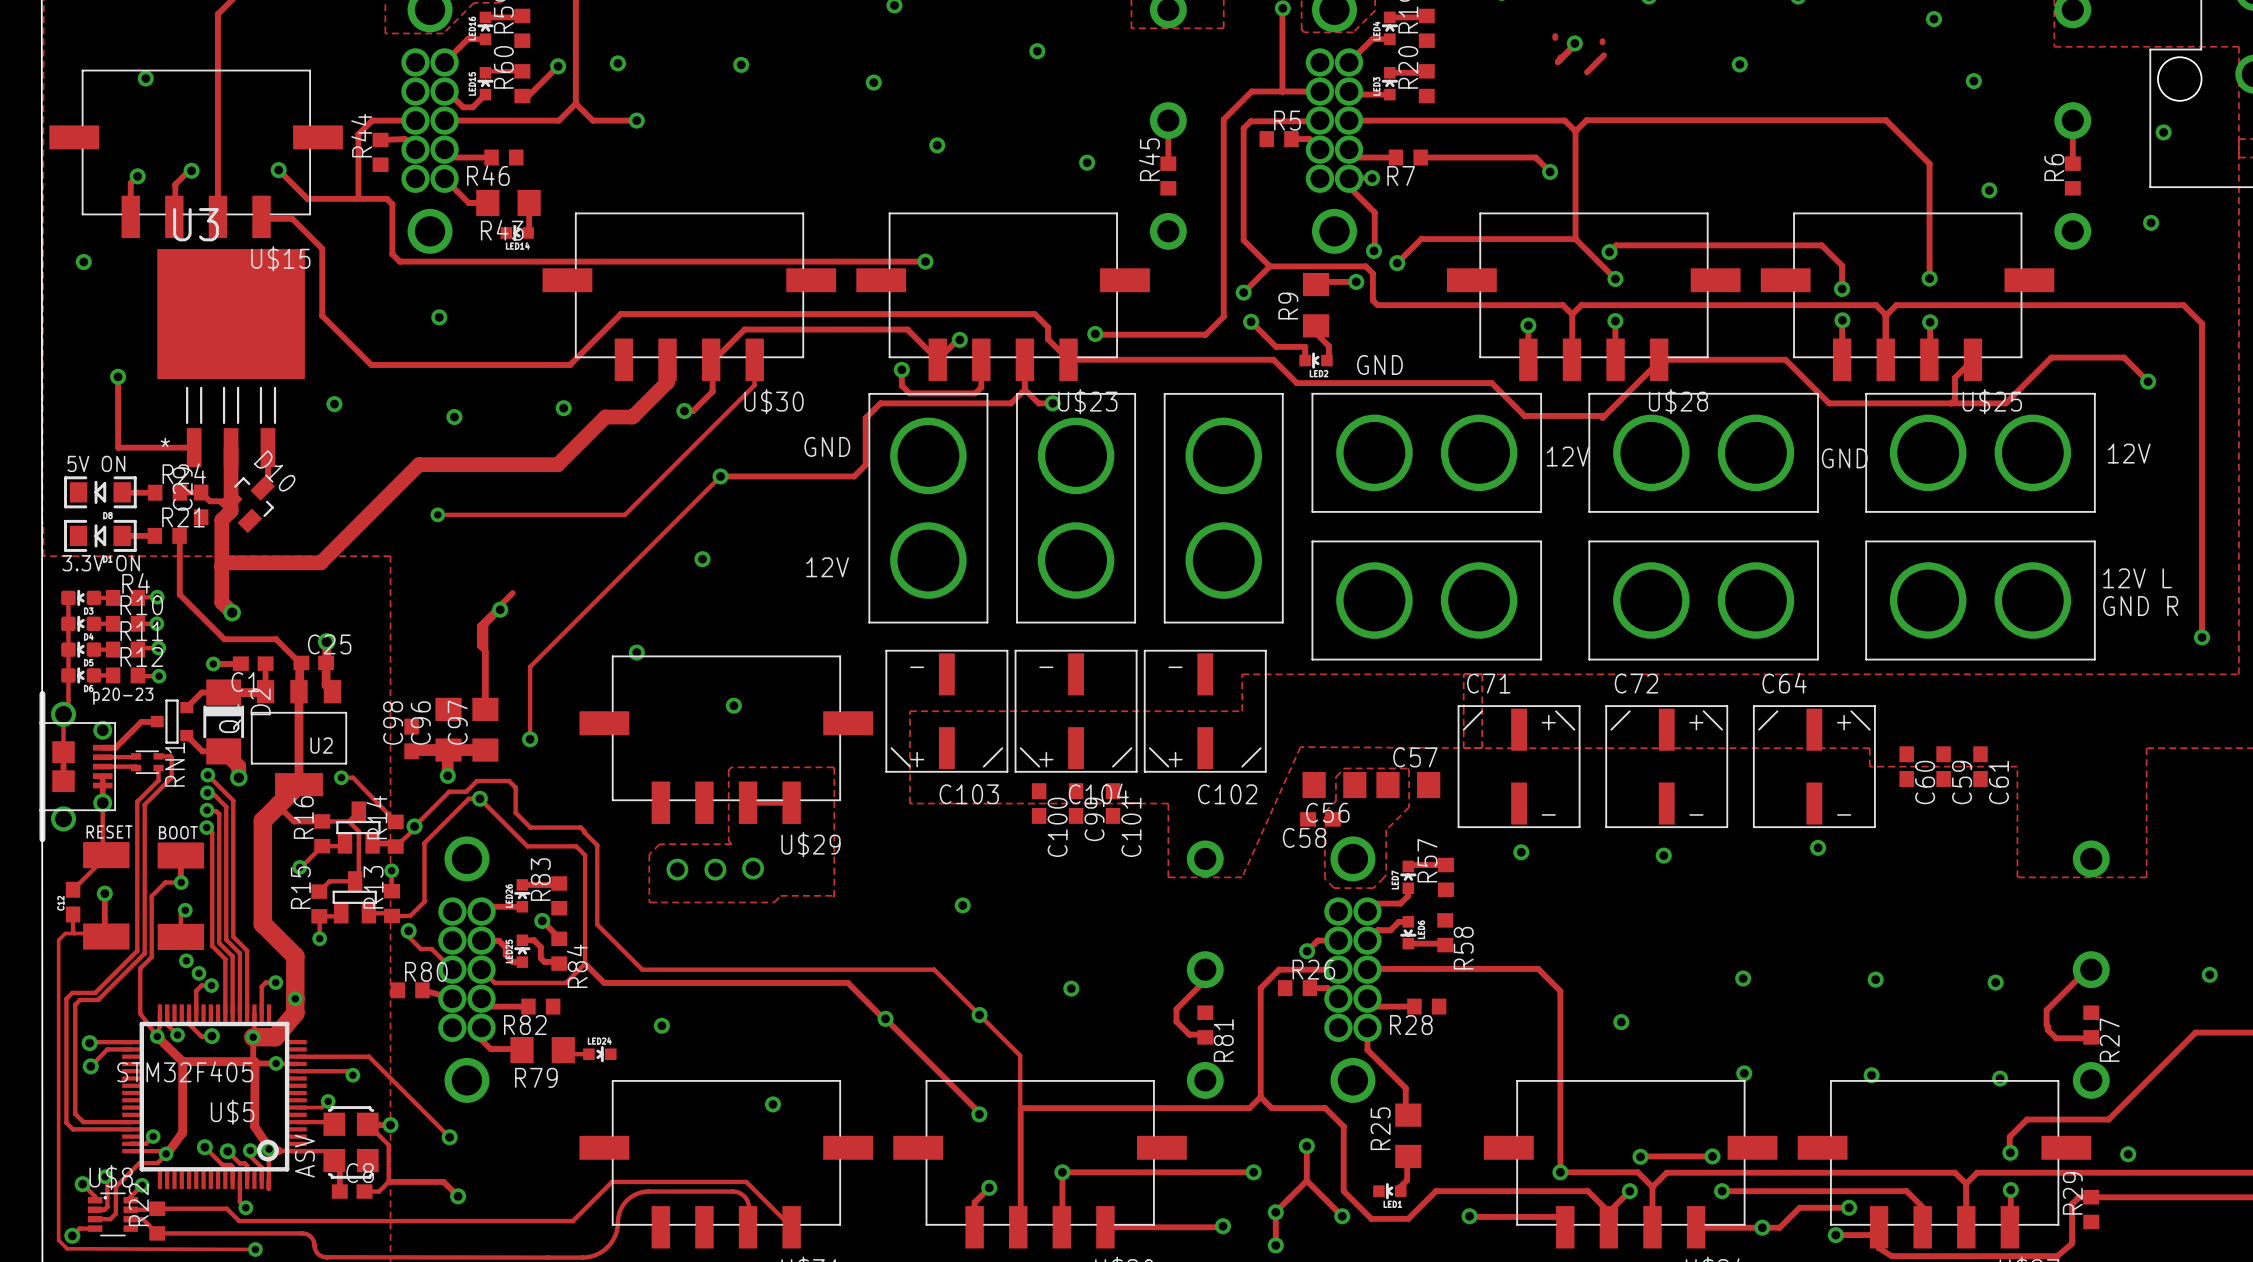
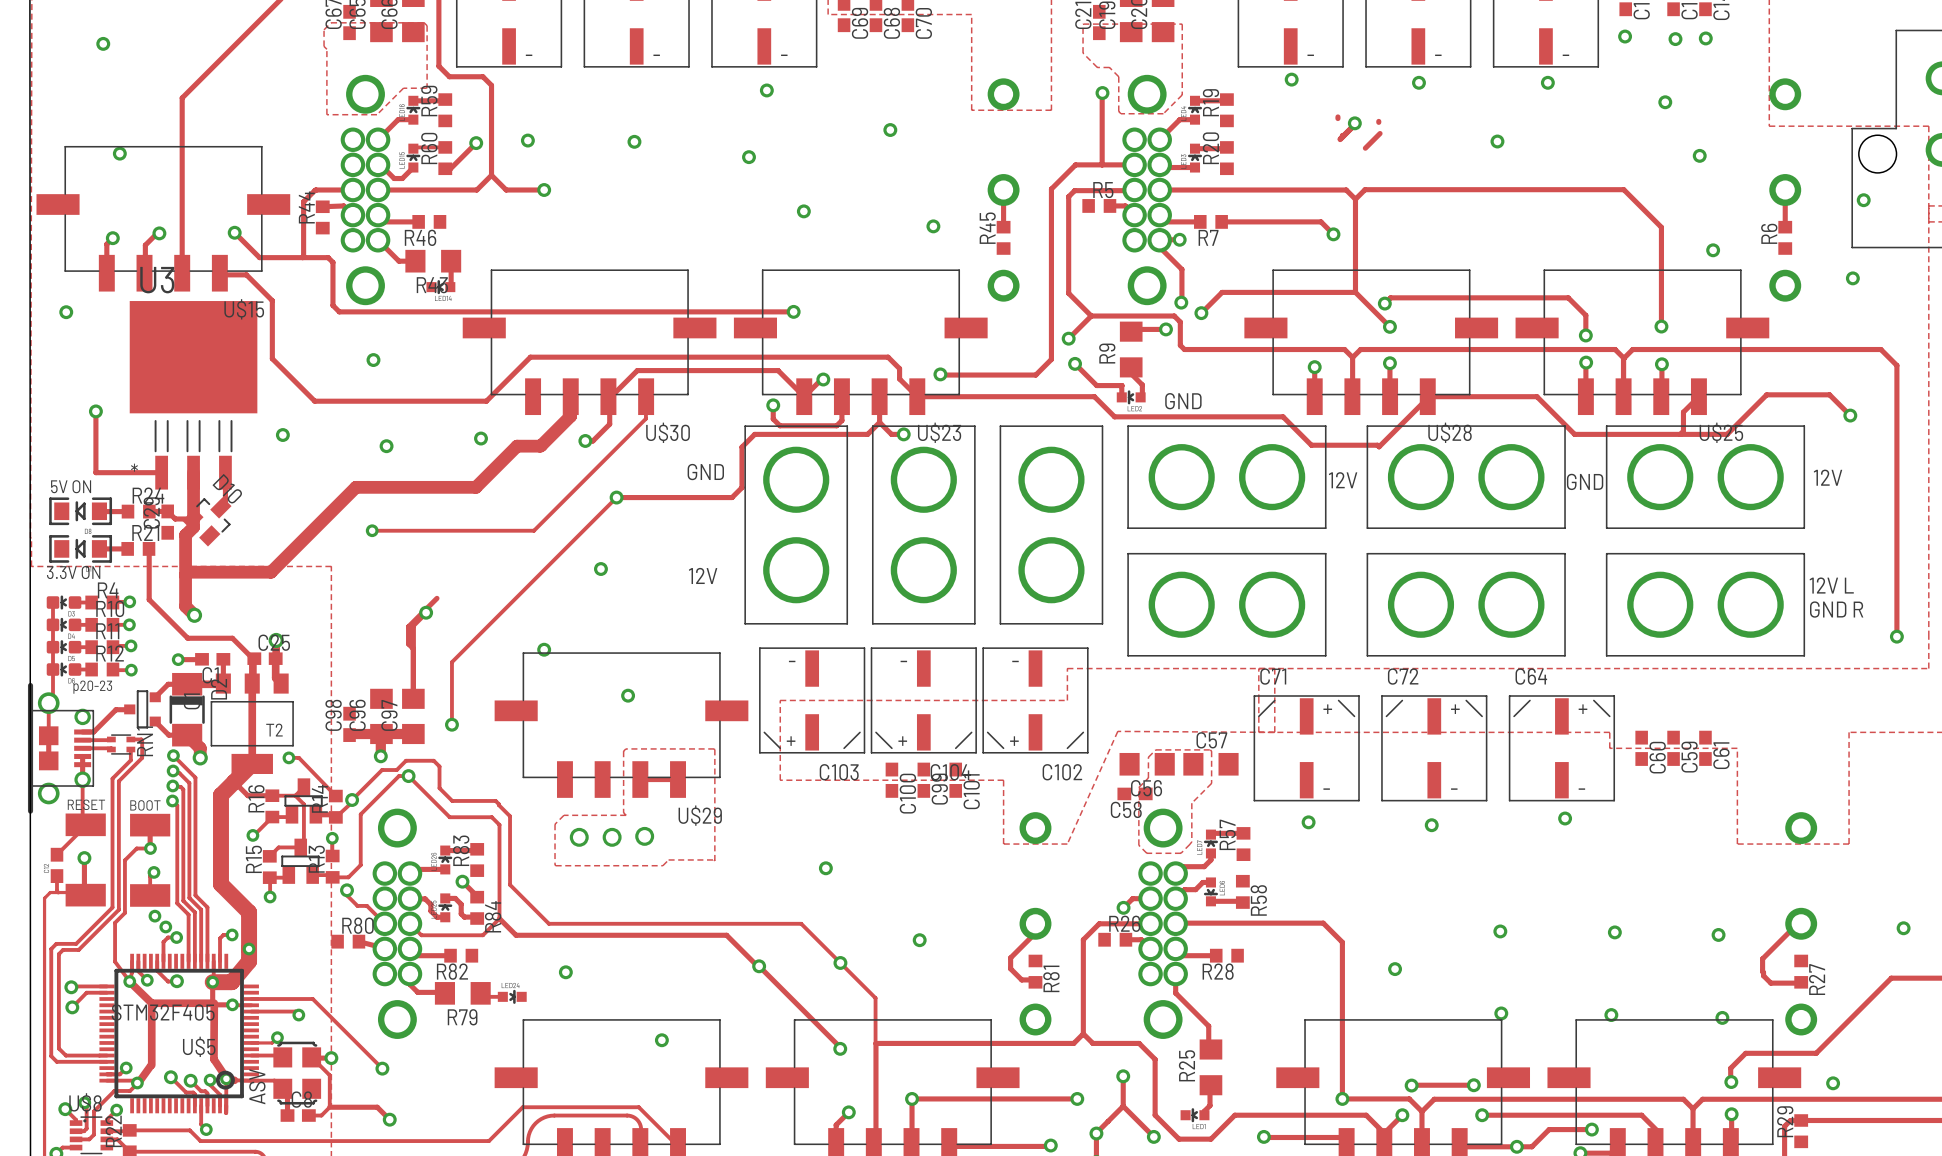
U2 name: U2 (321, 745) -> T2 (274, 730)

